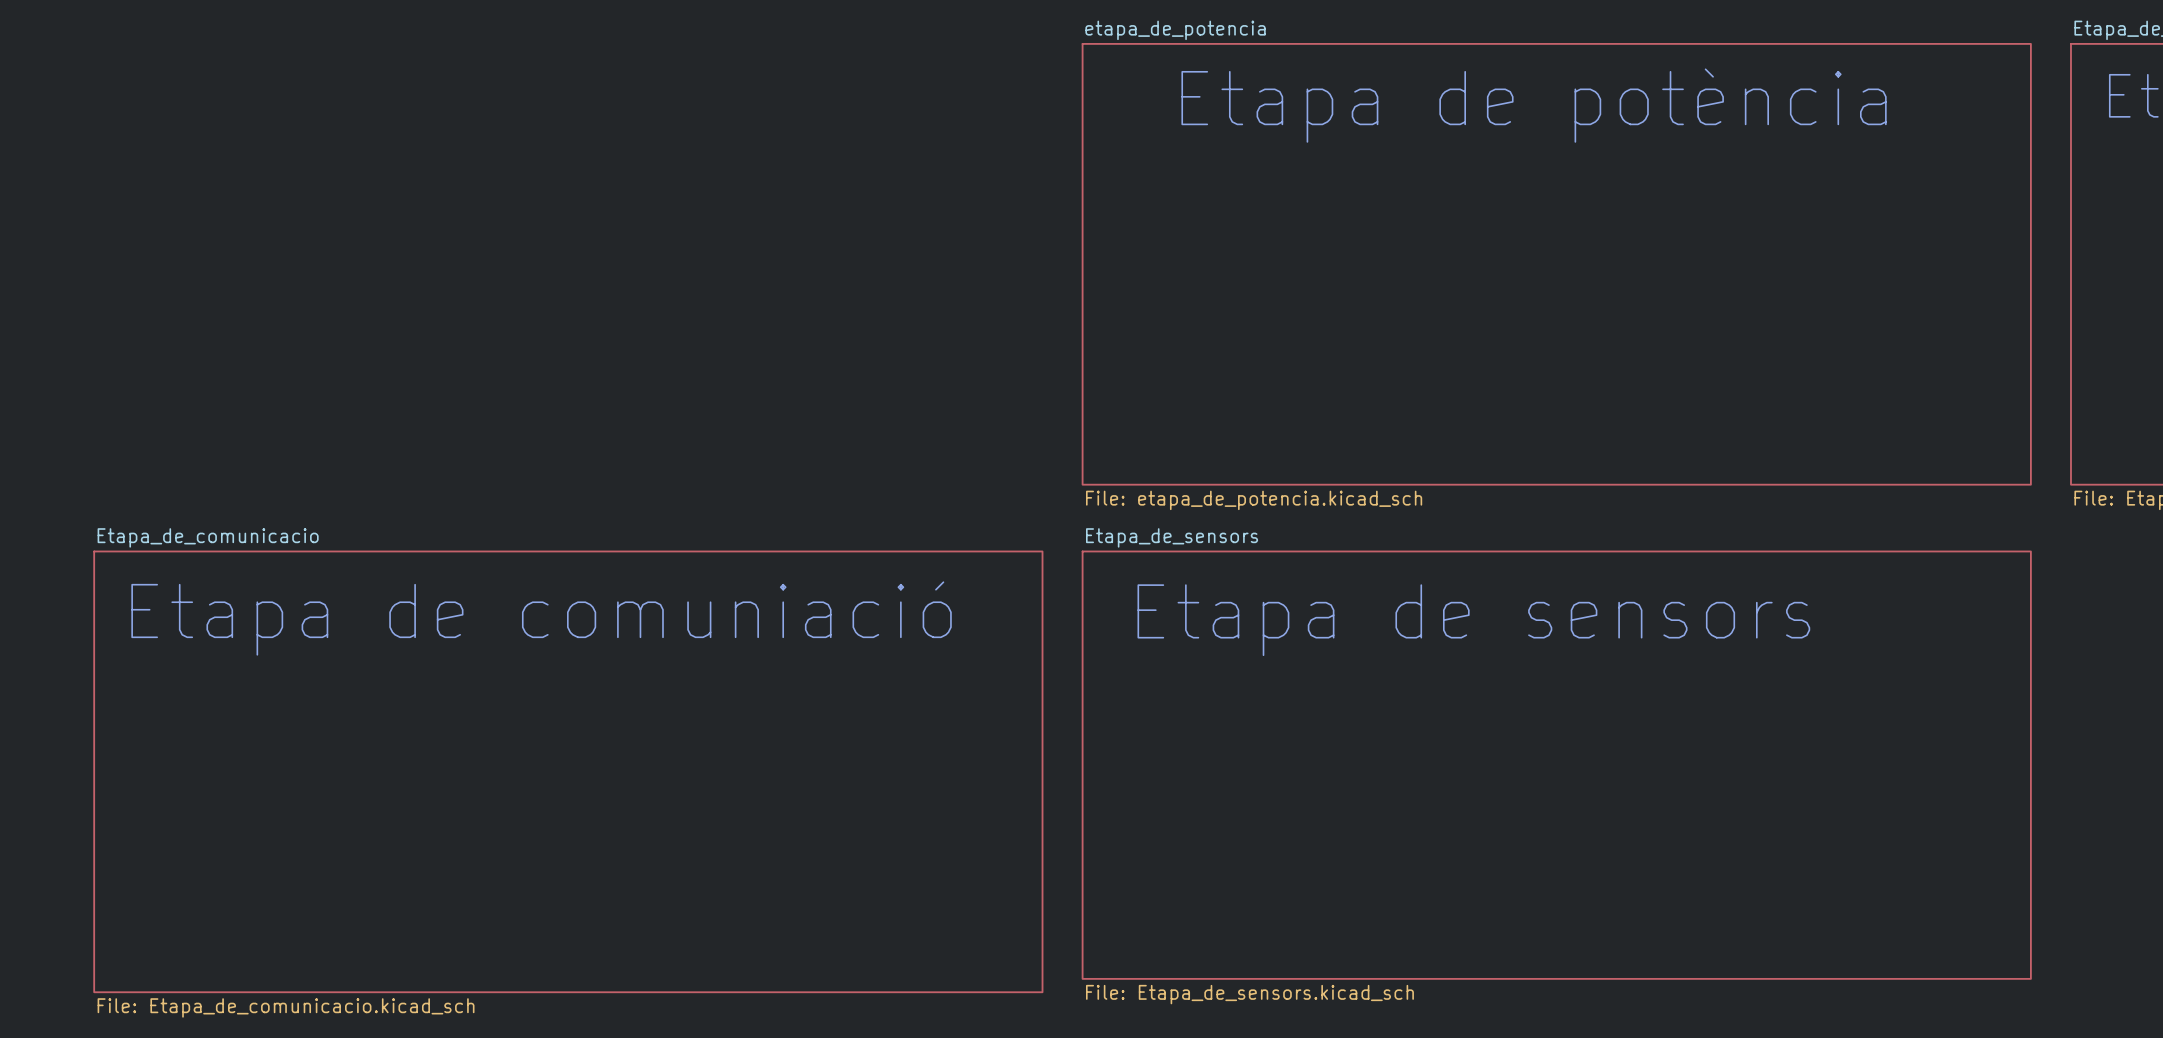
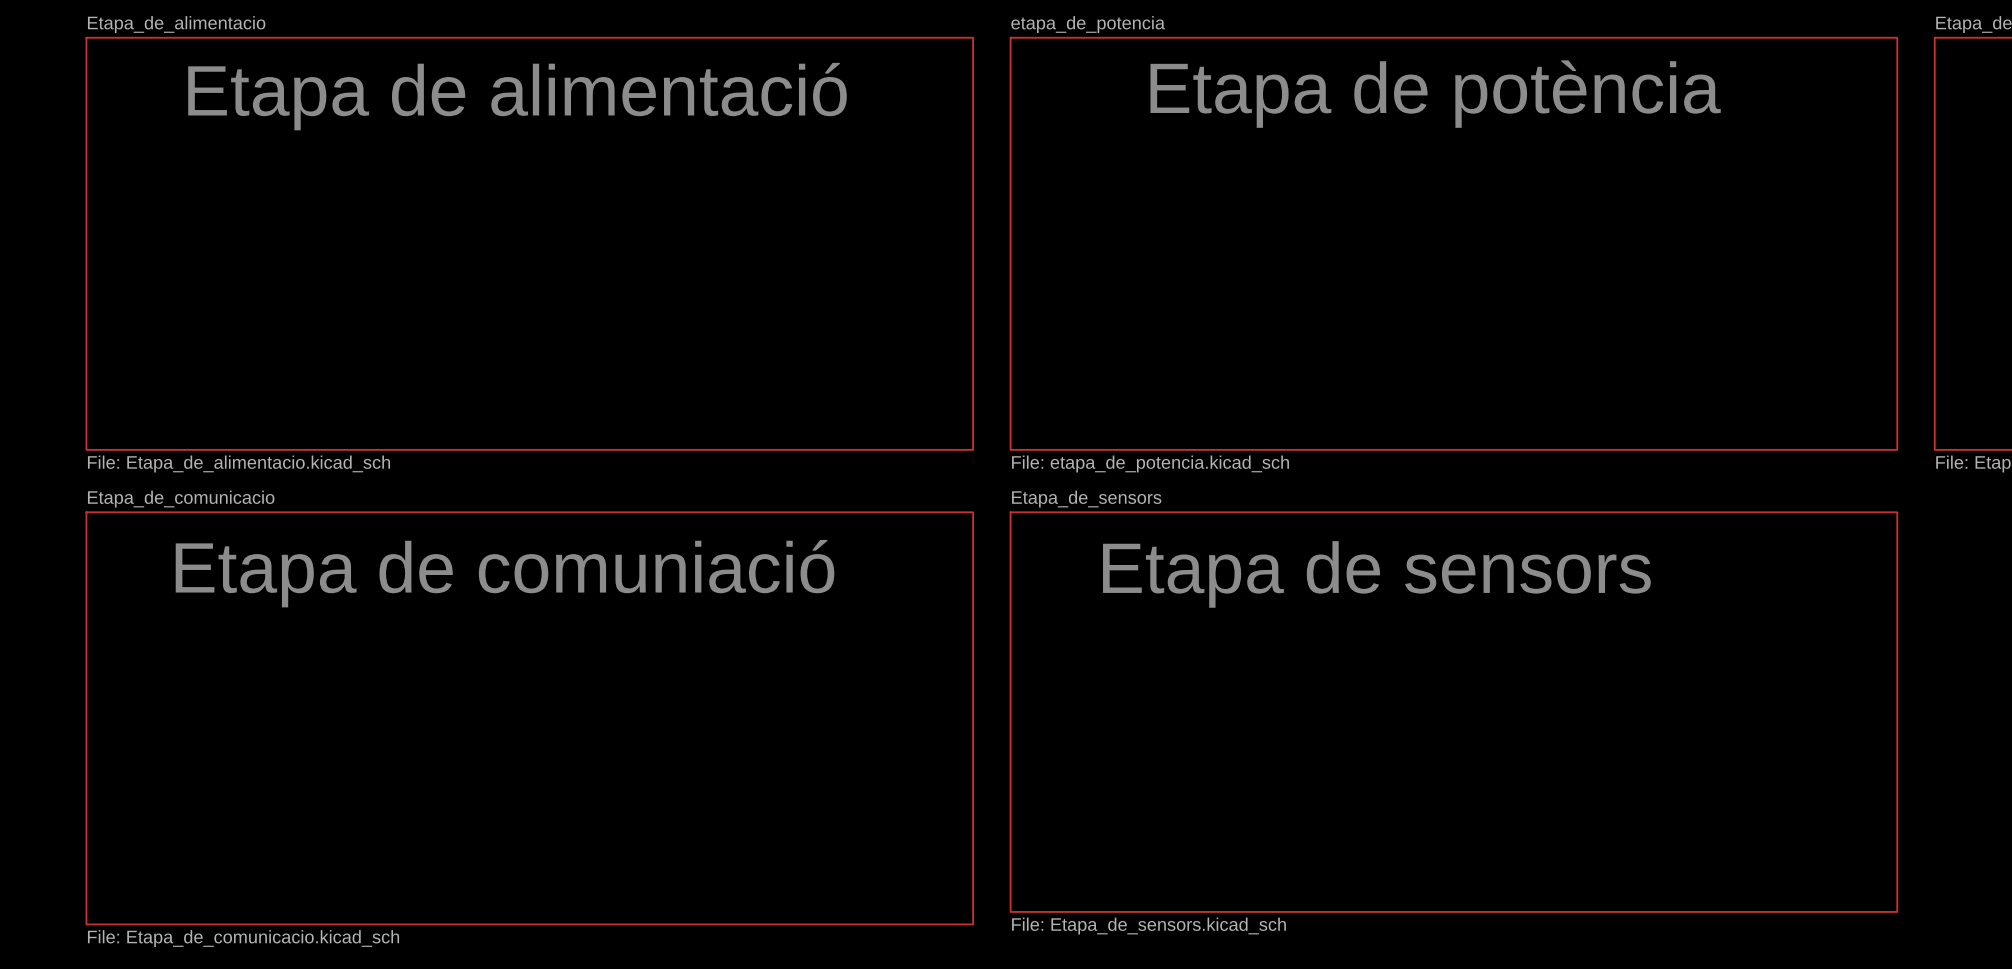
text: none -> Etapa de alimentació (517, 96)
sheet Etapa_de_alimentacio: none -> File: Etapa_de_alimentacio.kicad_sch (529, 243)

